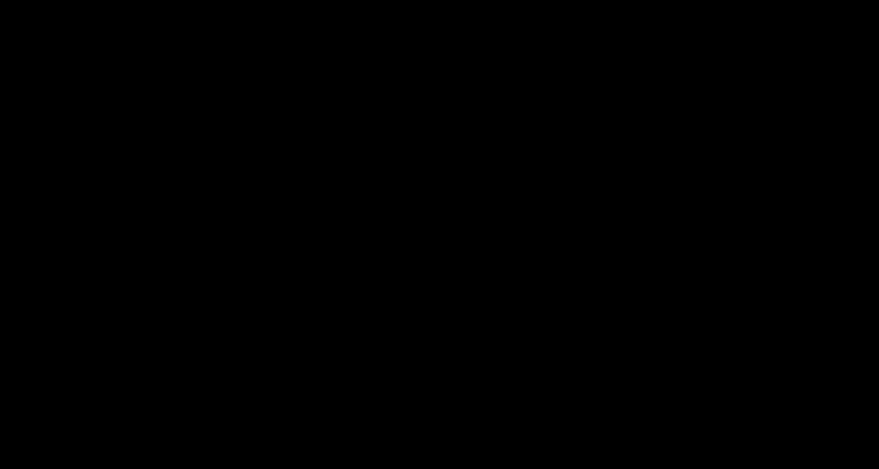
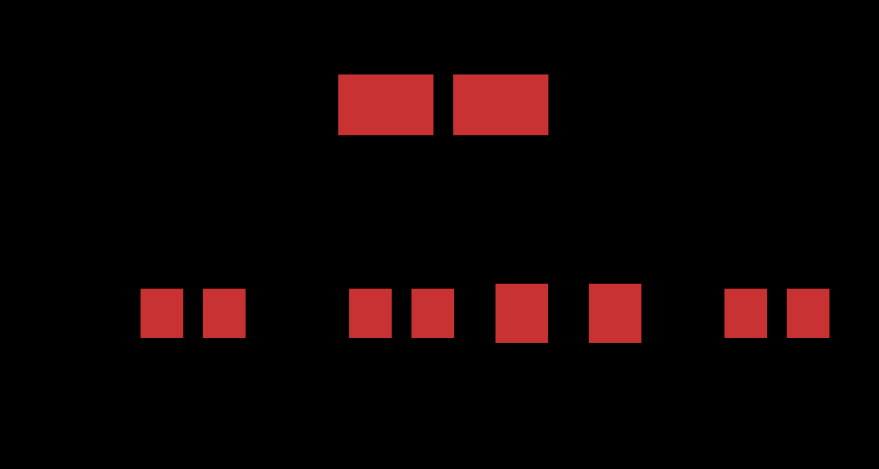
part: none -> (443, 104)
part: none -> (193, 313)
part: none -> (401, 313)
part: none -> (568, 313)
part: none -> (776, 313)

